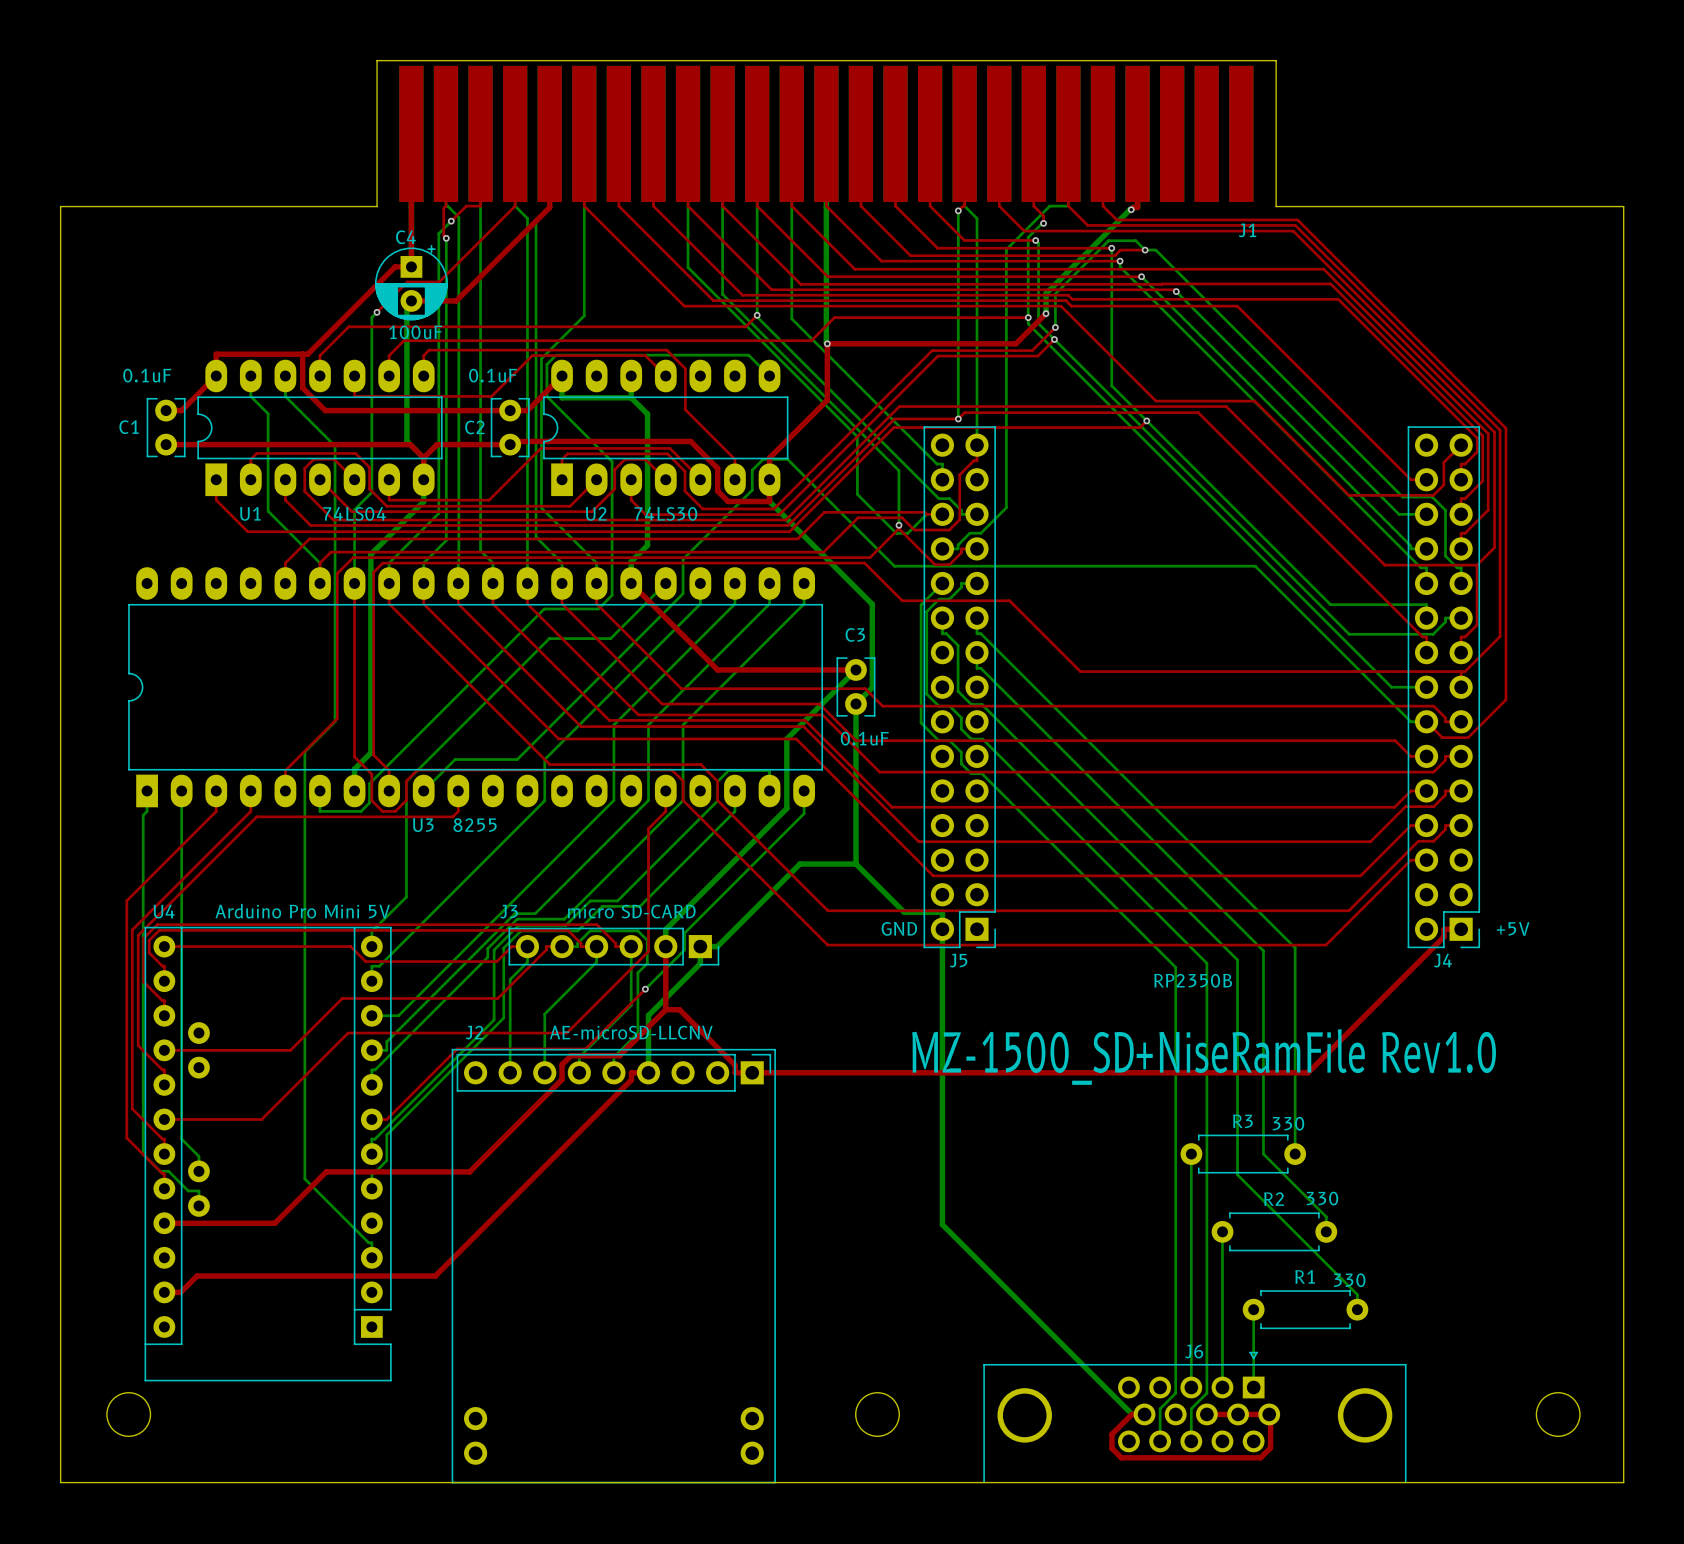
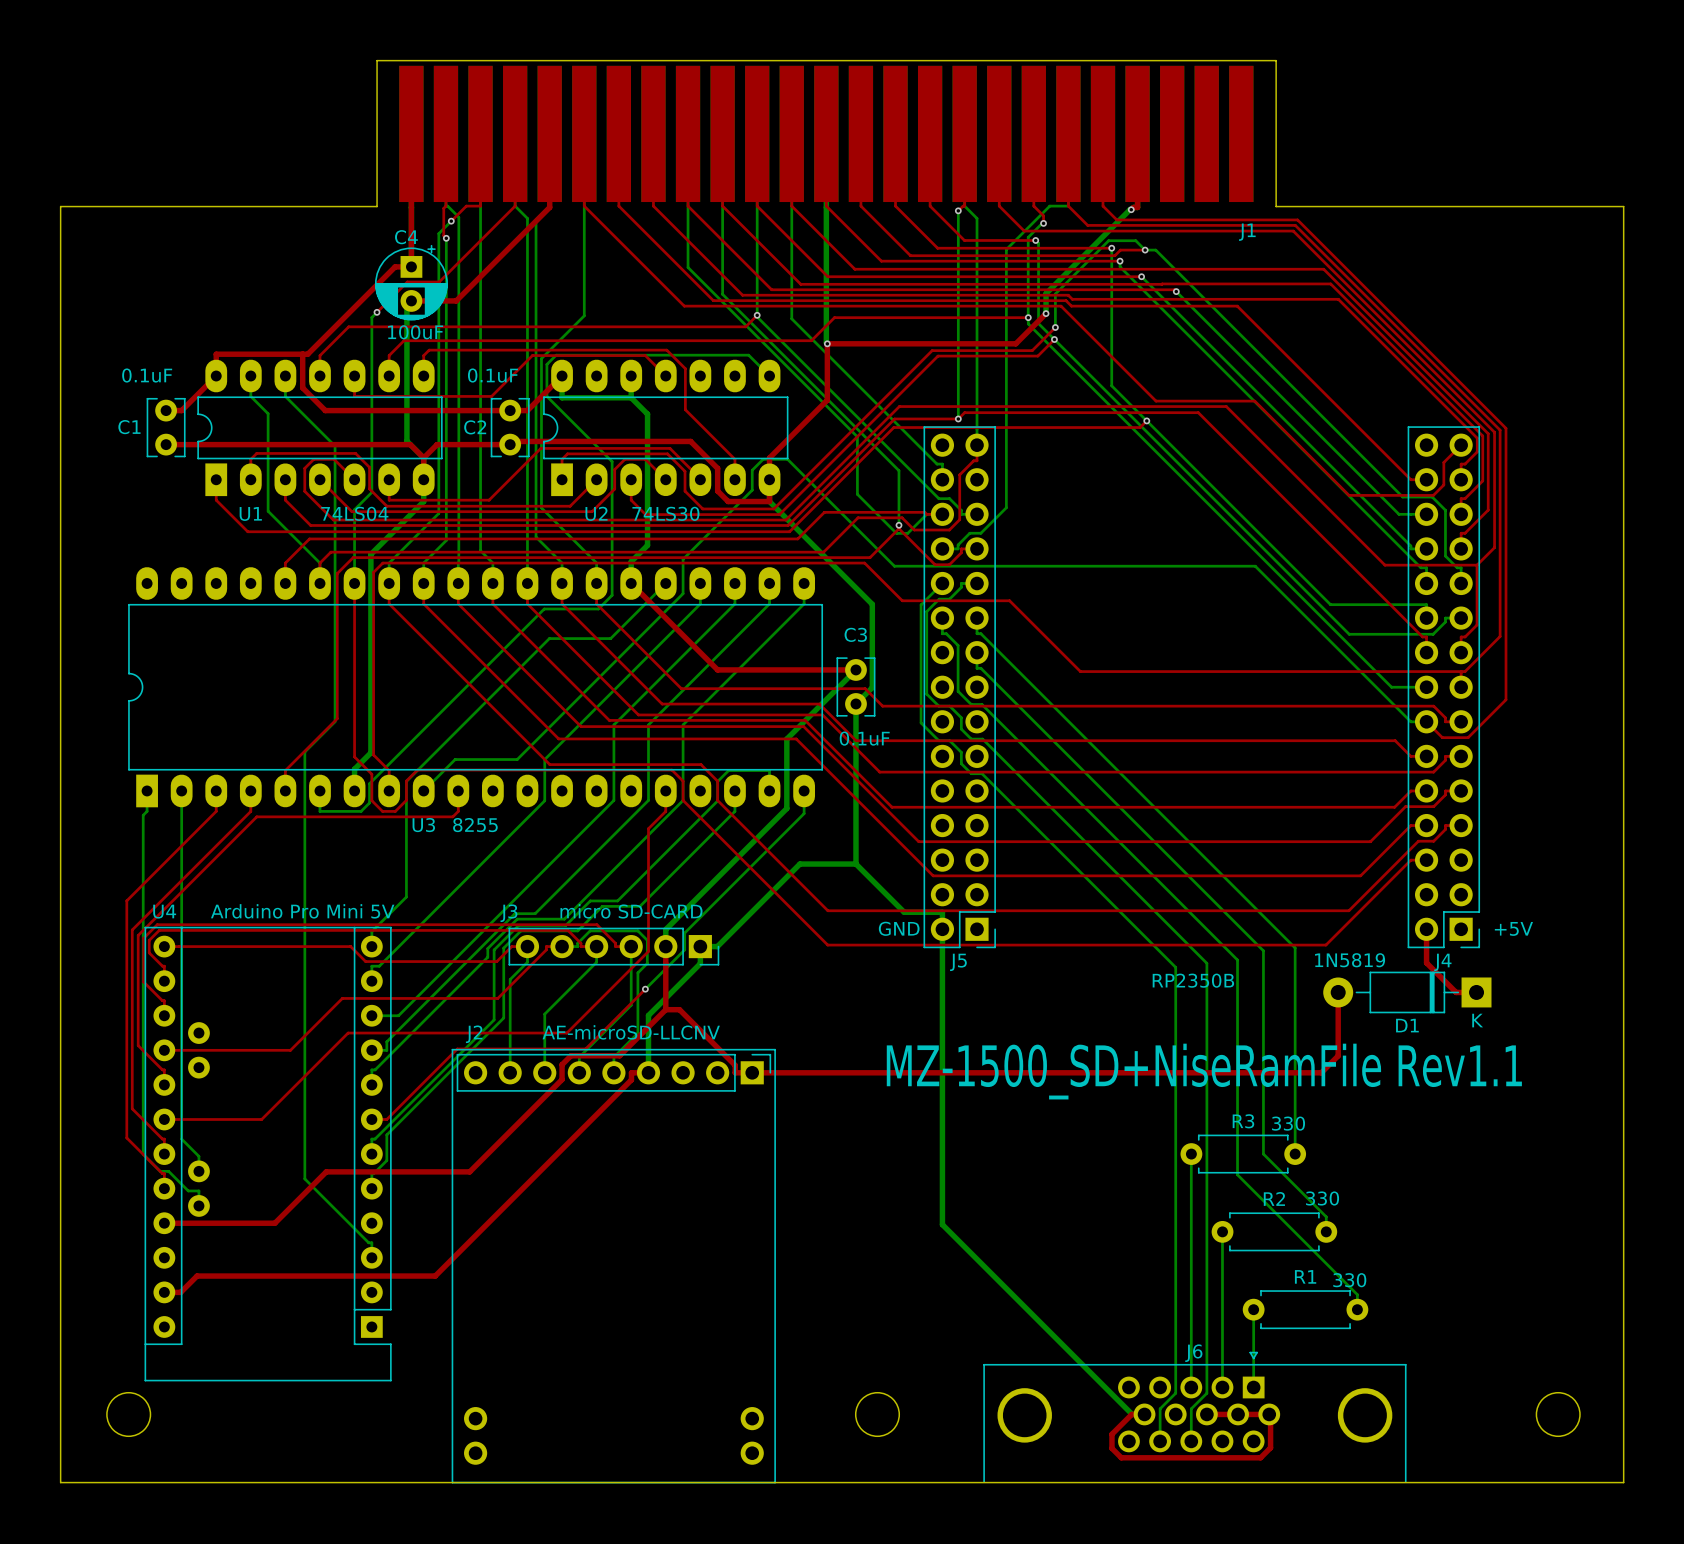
top track: none -> (1426, 929) (1426, 962) (1456, 992) (1476, 992)
top track: (1461, 929) (1444, 929) (1444, 936) (1308, 1072) -> (1338, 992) (1338, 1055) (1321, 1072) (1308, 1072)
text: none -> 1N5819 (1350, 960)
D1: none -> (1407, 992)
text: MZ-1500_SD+NiseRamFile Rev1.0 (1204, 1056) -> MZ-1500_SD+NiseRamFile Rev1.1 (1204, 1071)

